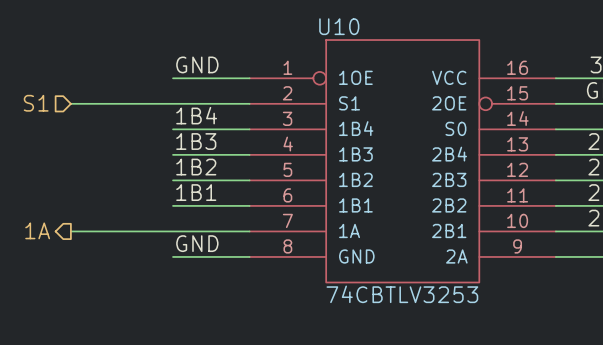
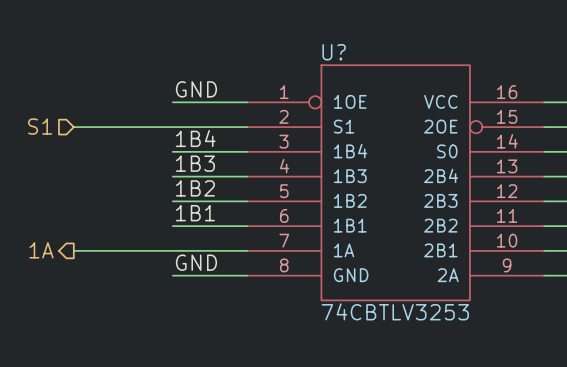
U10 name: U10 (339, 26) -> U? (334, 52)

